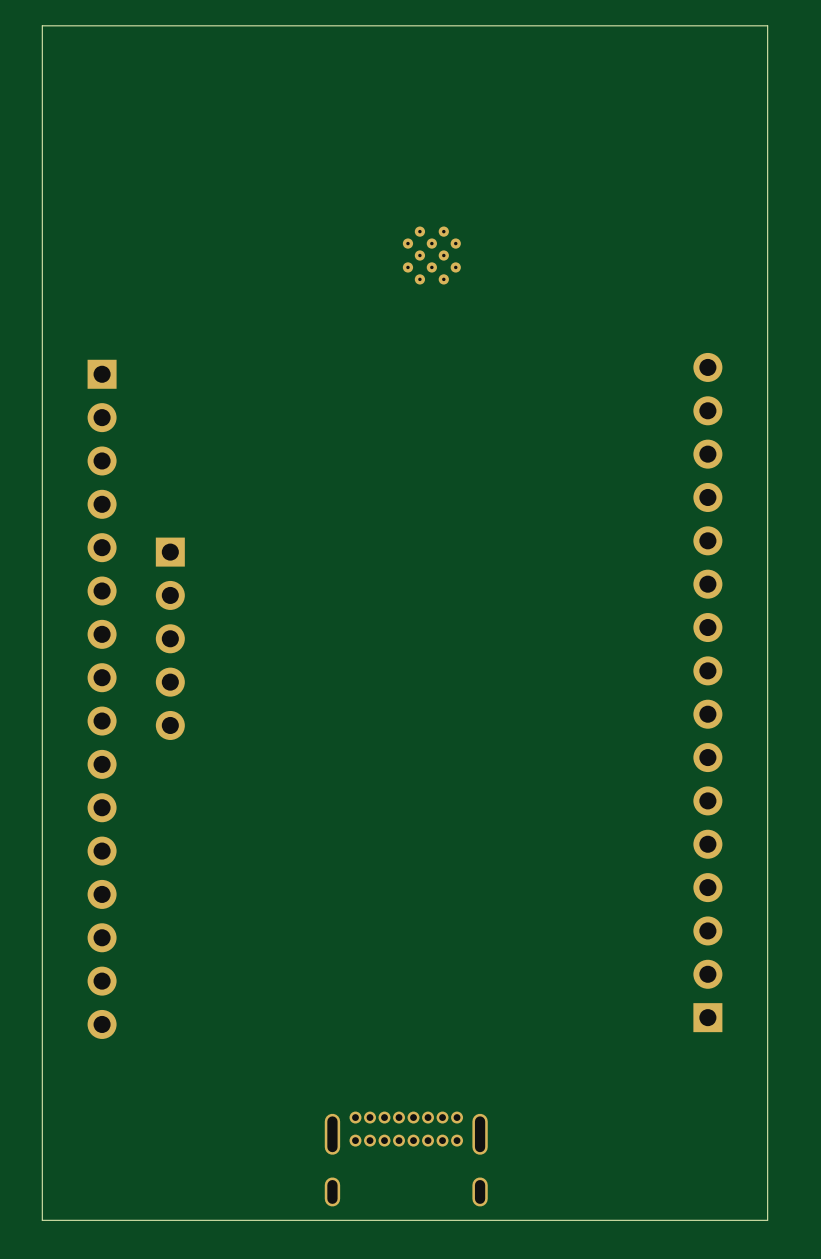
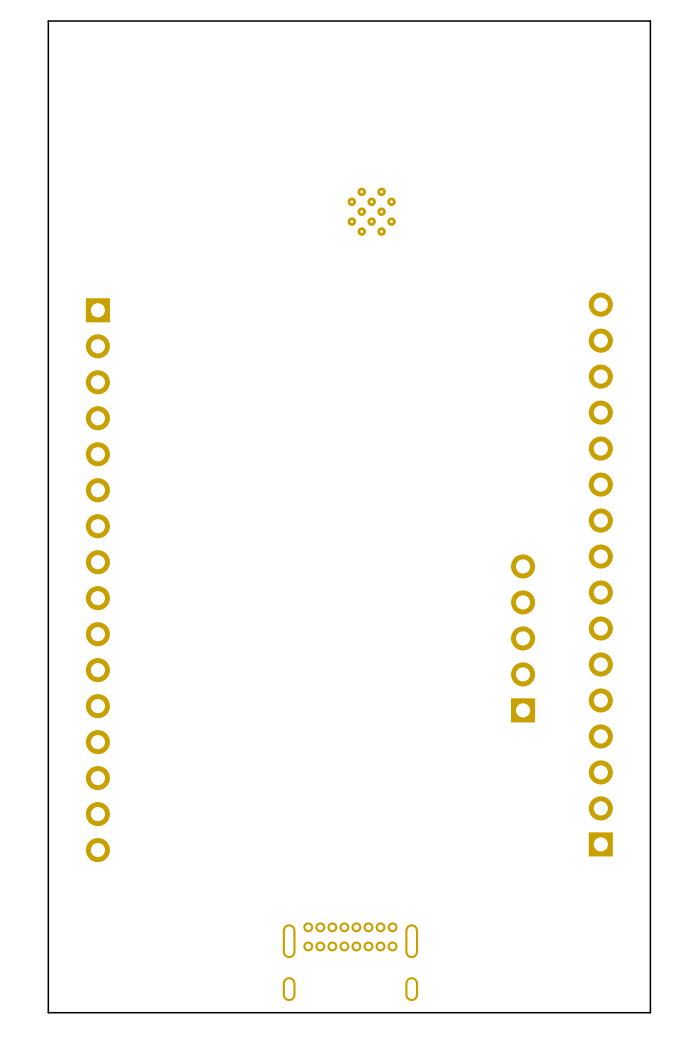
part: (170, 638) -> none
part: none -> (523, 638)

